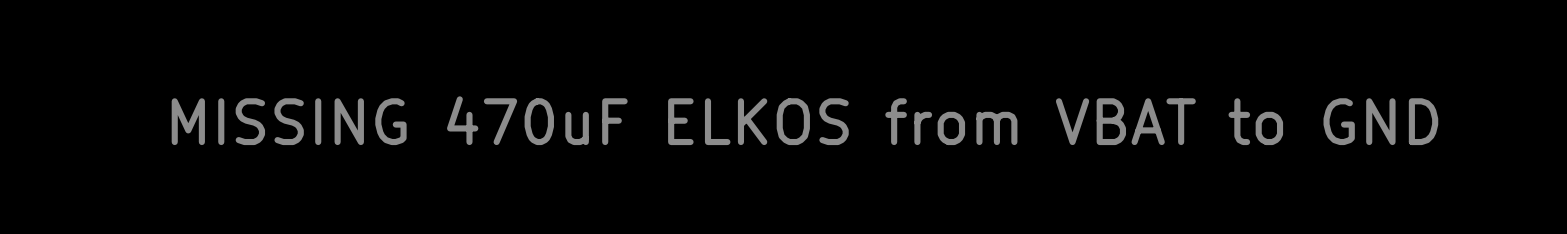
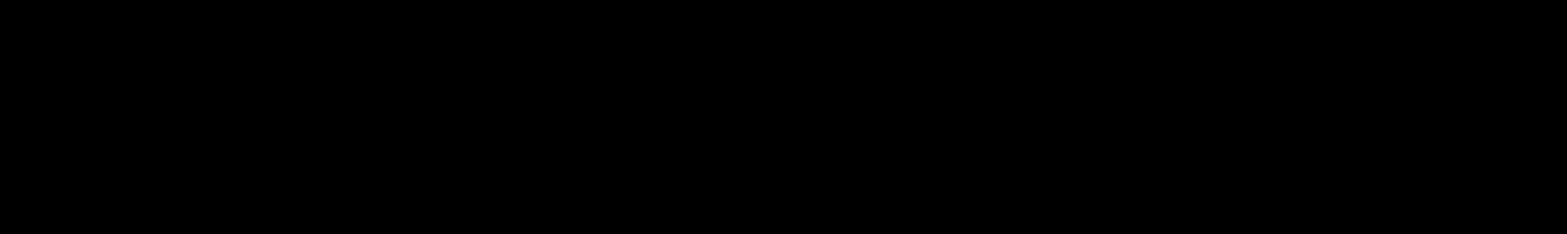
text: MISSING 470uF ELKOS from VBAT to GND (804, 120) -> none

